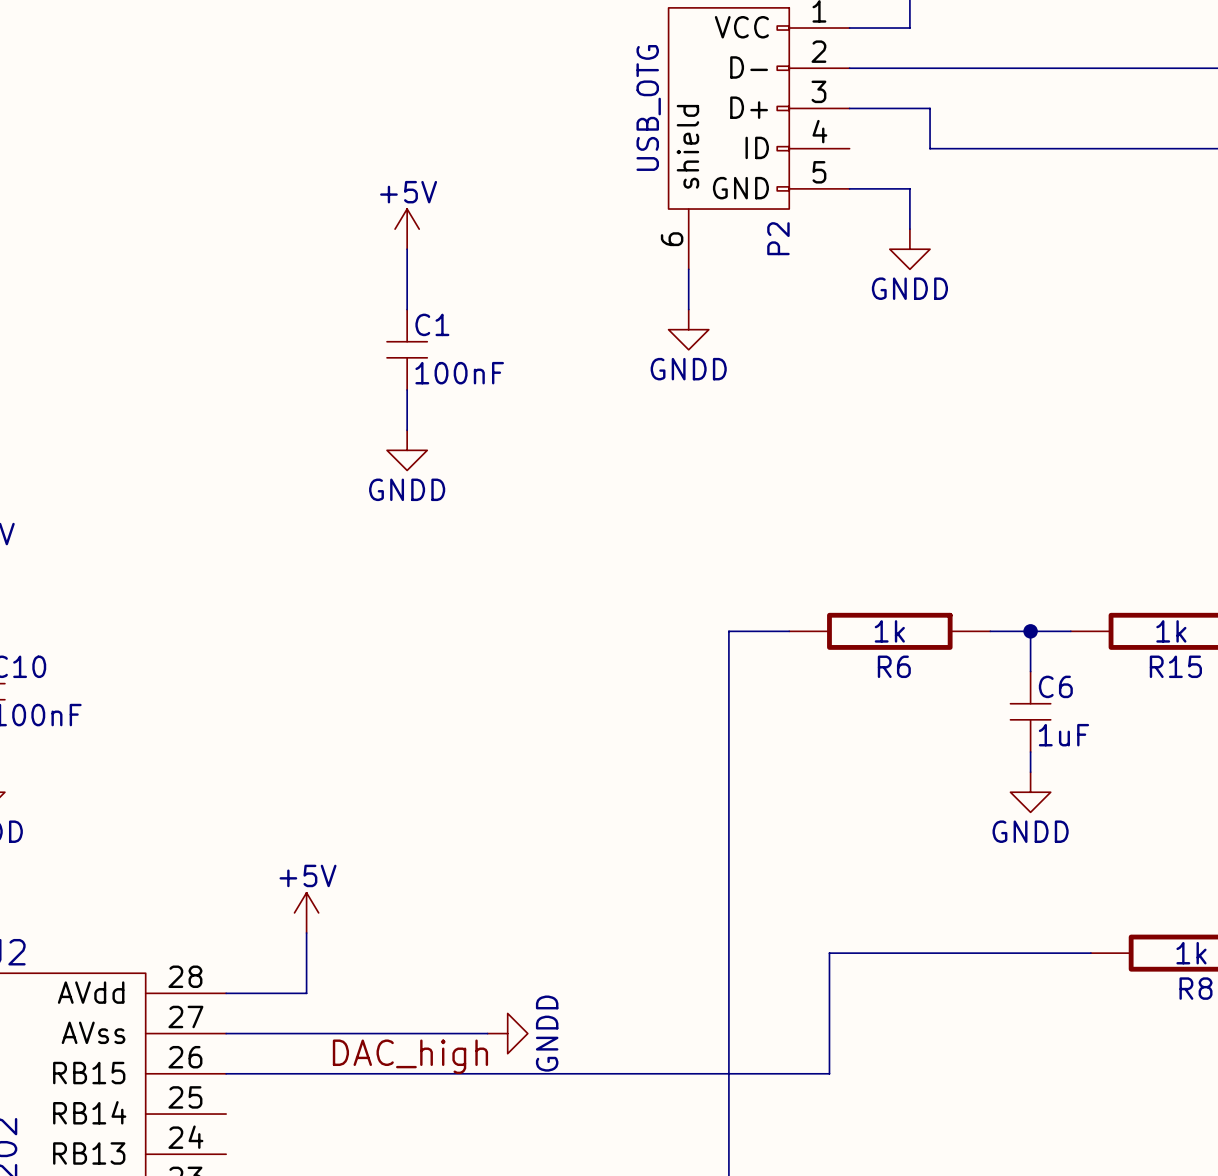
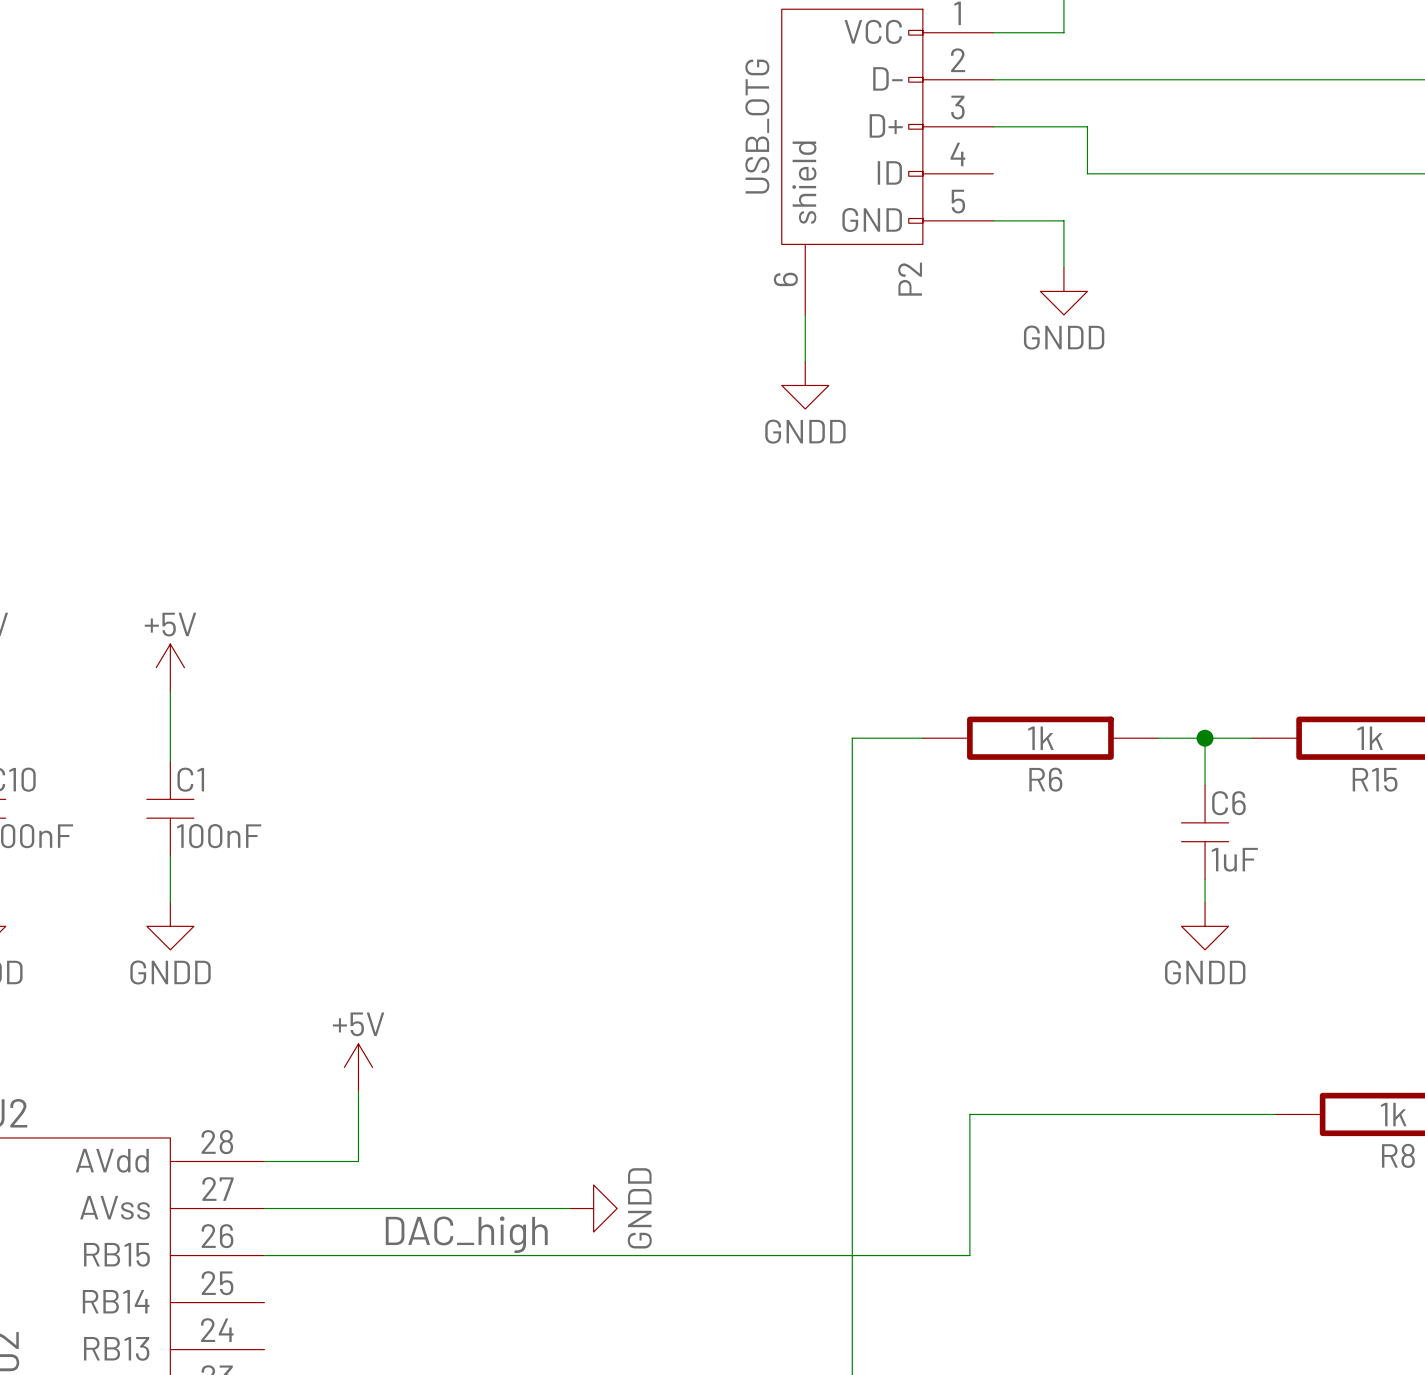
power symbol: +5V (407, 229) -> none
wire: (407, 249) (407, 309) -> none
C1 position: (407, 349) -> (170, 808)
wire: (407, 390) (407, 430) -> none
power symbol: GNDD (407, 450) -> none
power symbol: none -> +5V (170, 667)
wire: none -> (170, 691) (170, 761)
wire: none -> (170, 855) (170, 902)
power symbol: none -> GNDD (170, 926)

